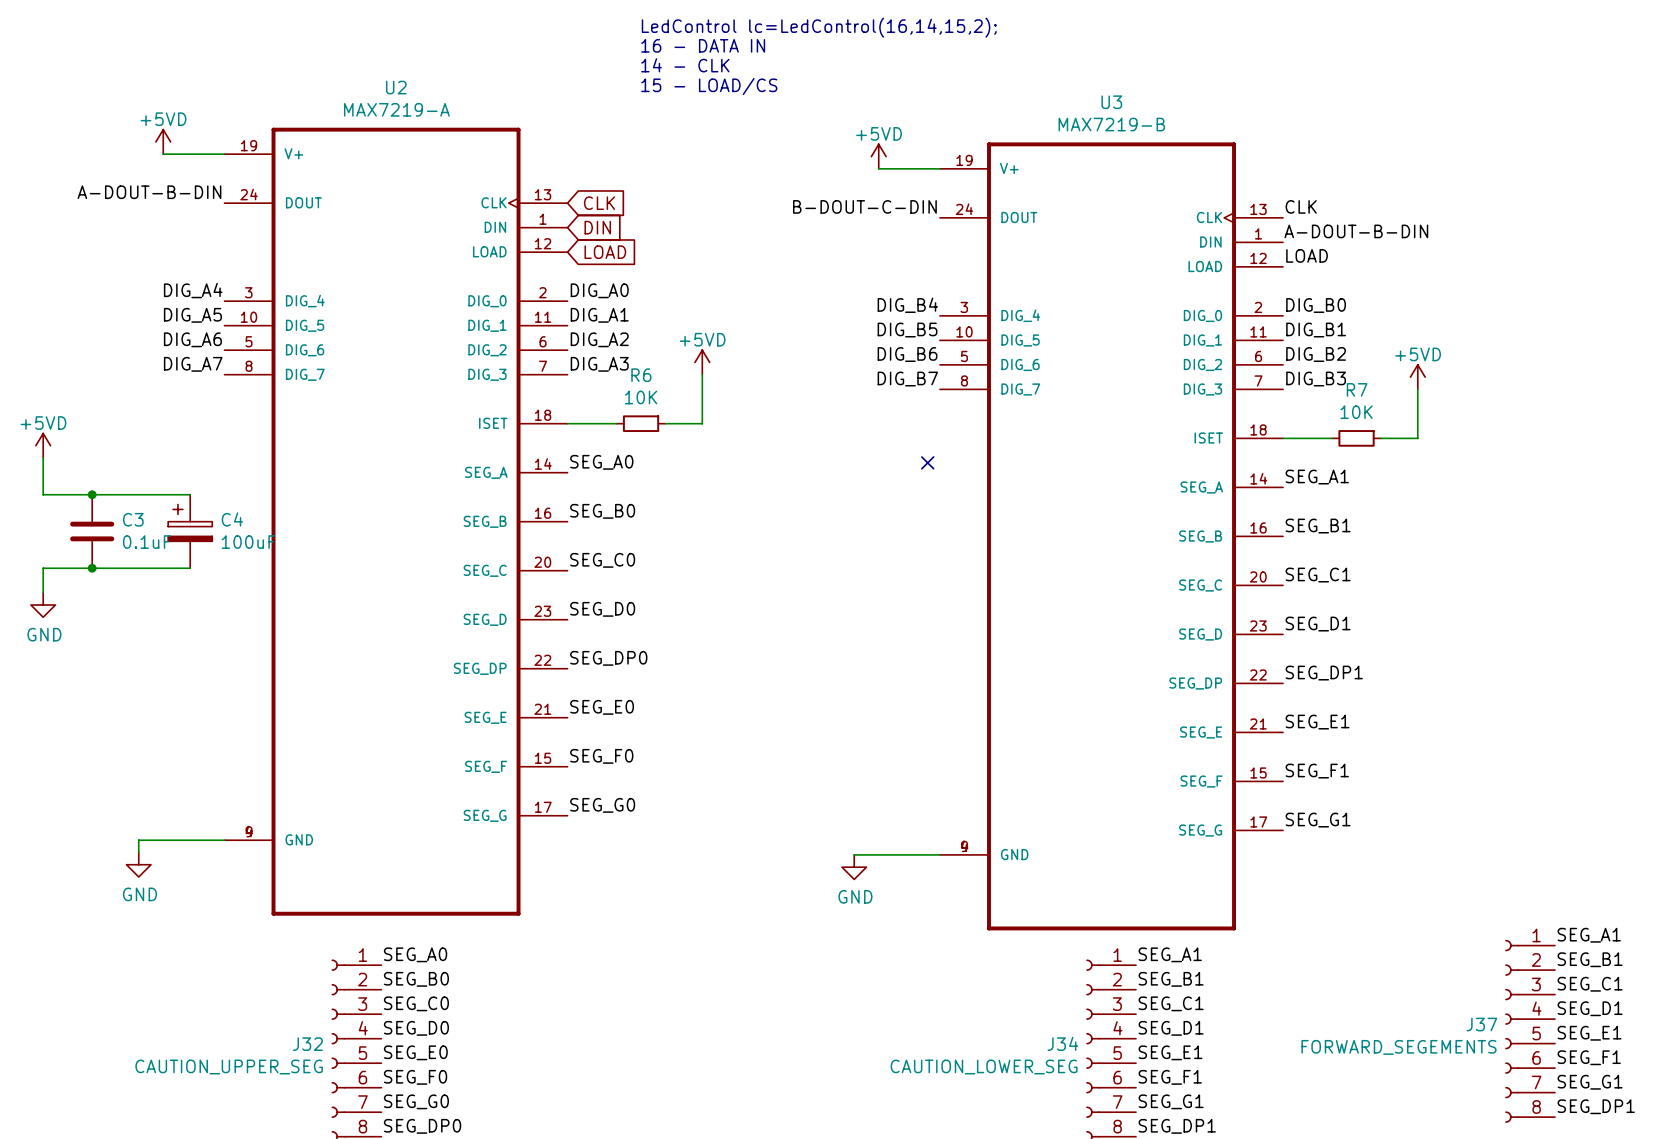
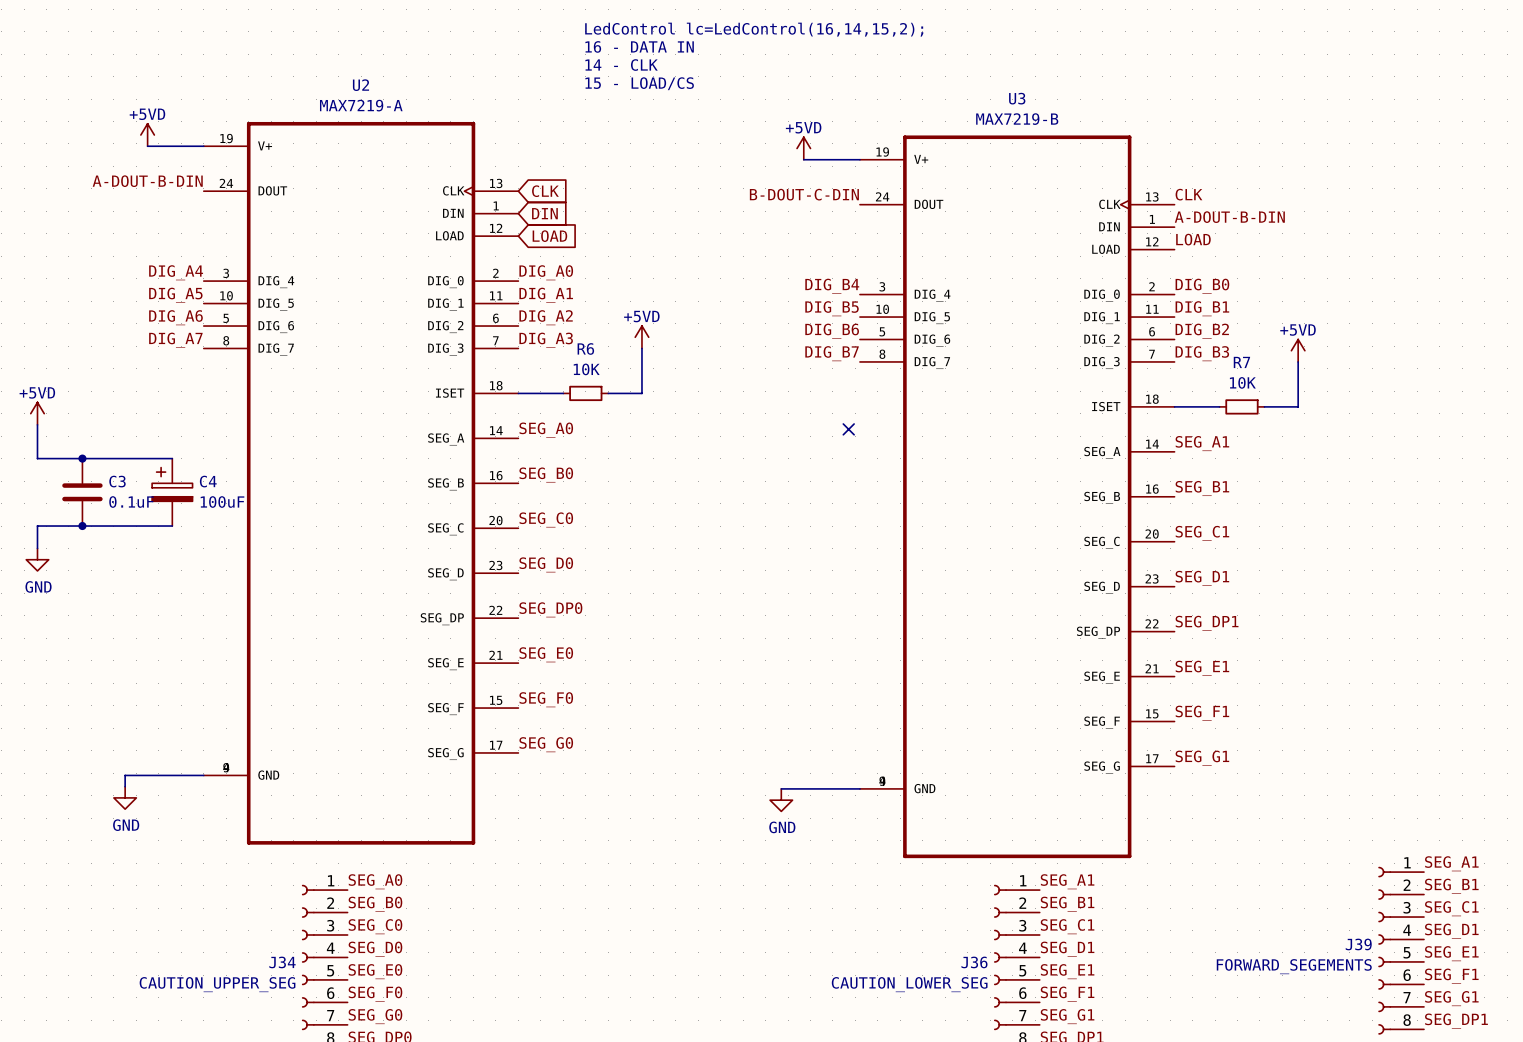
J37 name: J37 (1481, 1024) -> J39 (1358, 944)
J34 name: J34 (1062, 1043) -> J36 (974, 962)
J32 name: J32 (307, 1044) -> J34 (282, 962)

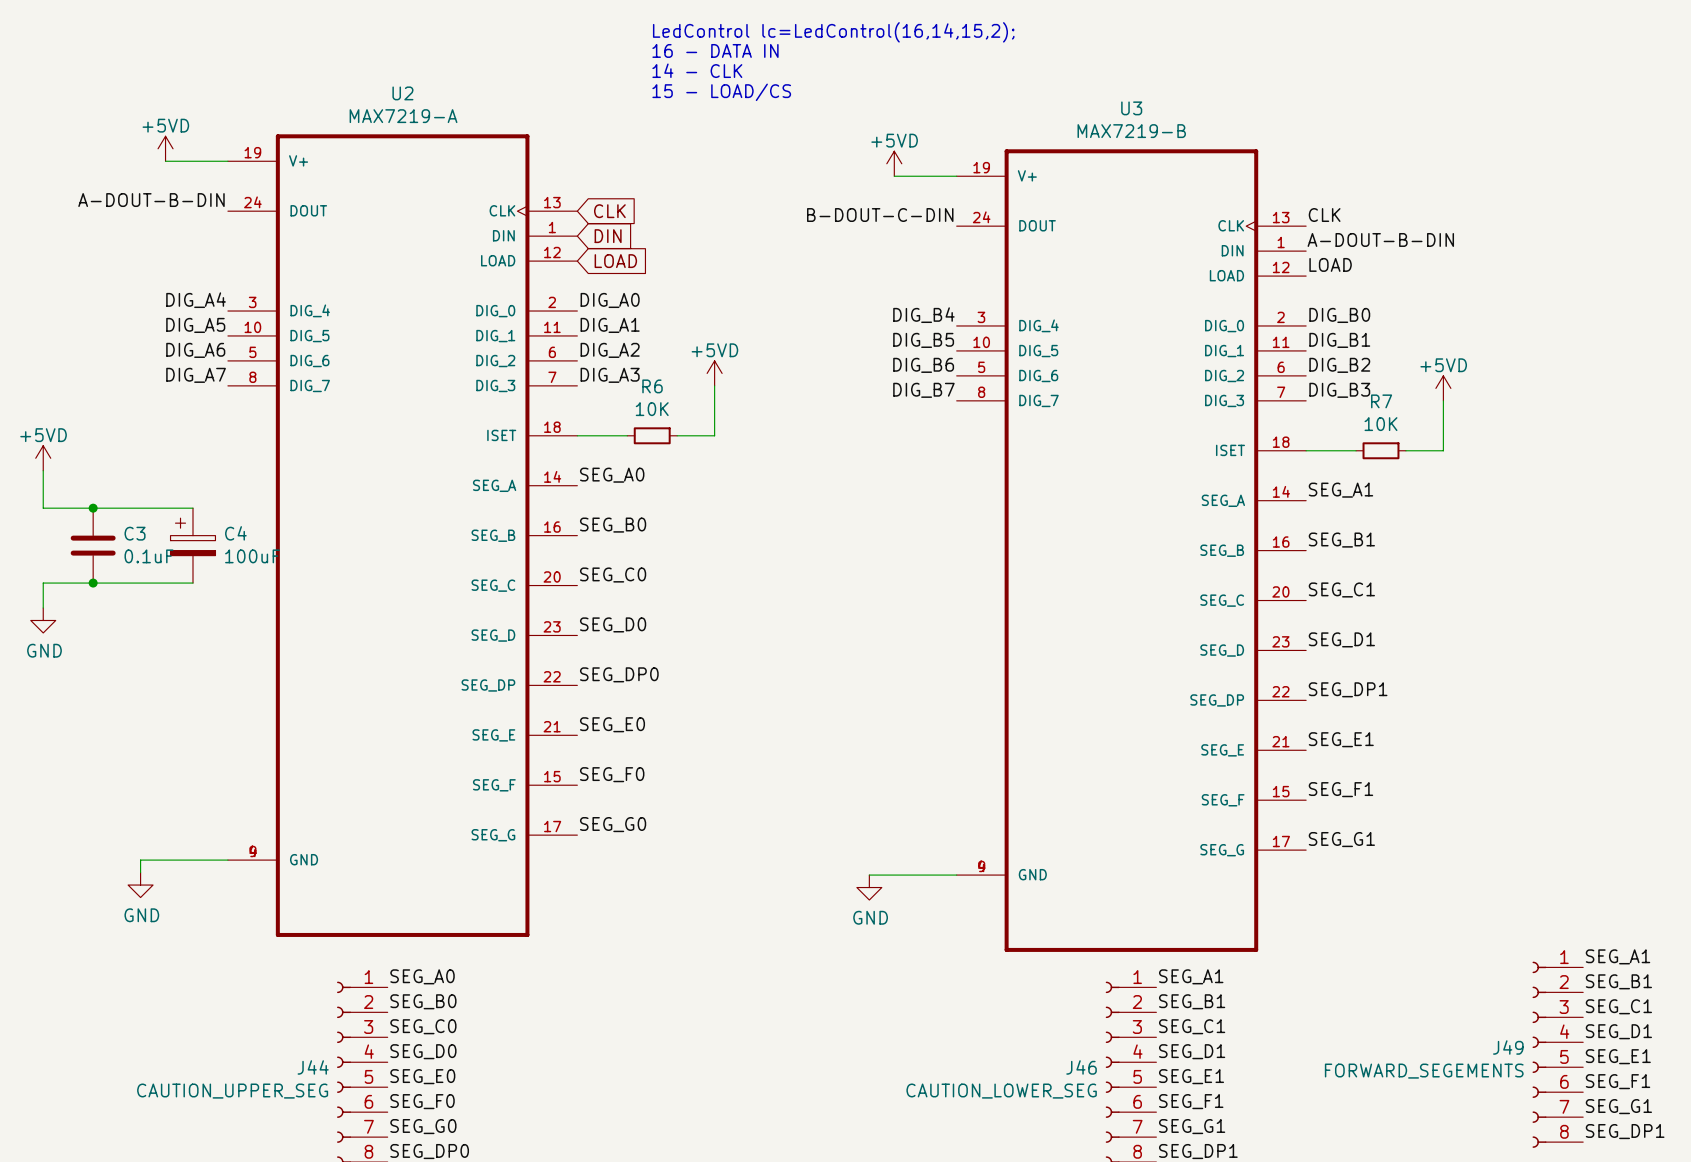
no-connect mark: (848, 429) -> none
J39 name: J39 (1358, 944) -> J49 (1508, 1047)
J34 name: J34 (282, 962) -> J44 (313, 1067)
J36 name: J36 (974, 962) -> J46 (1081, 1067)

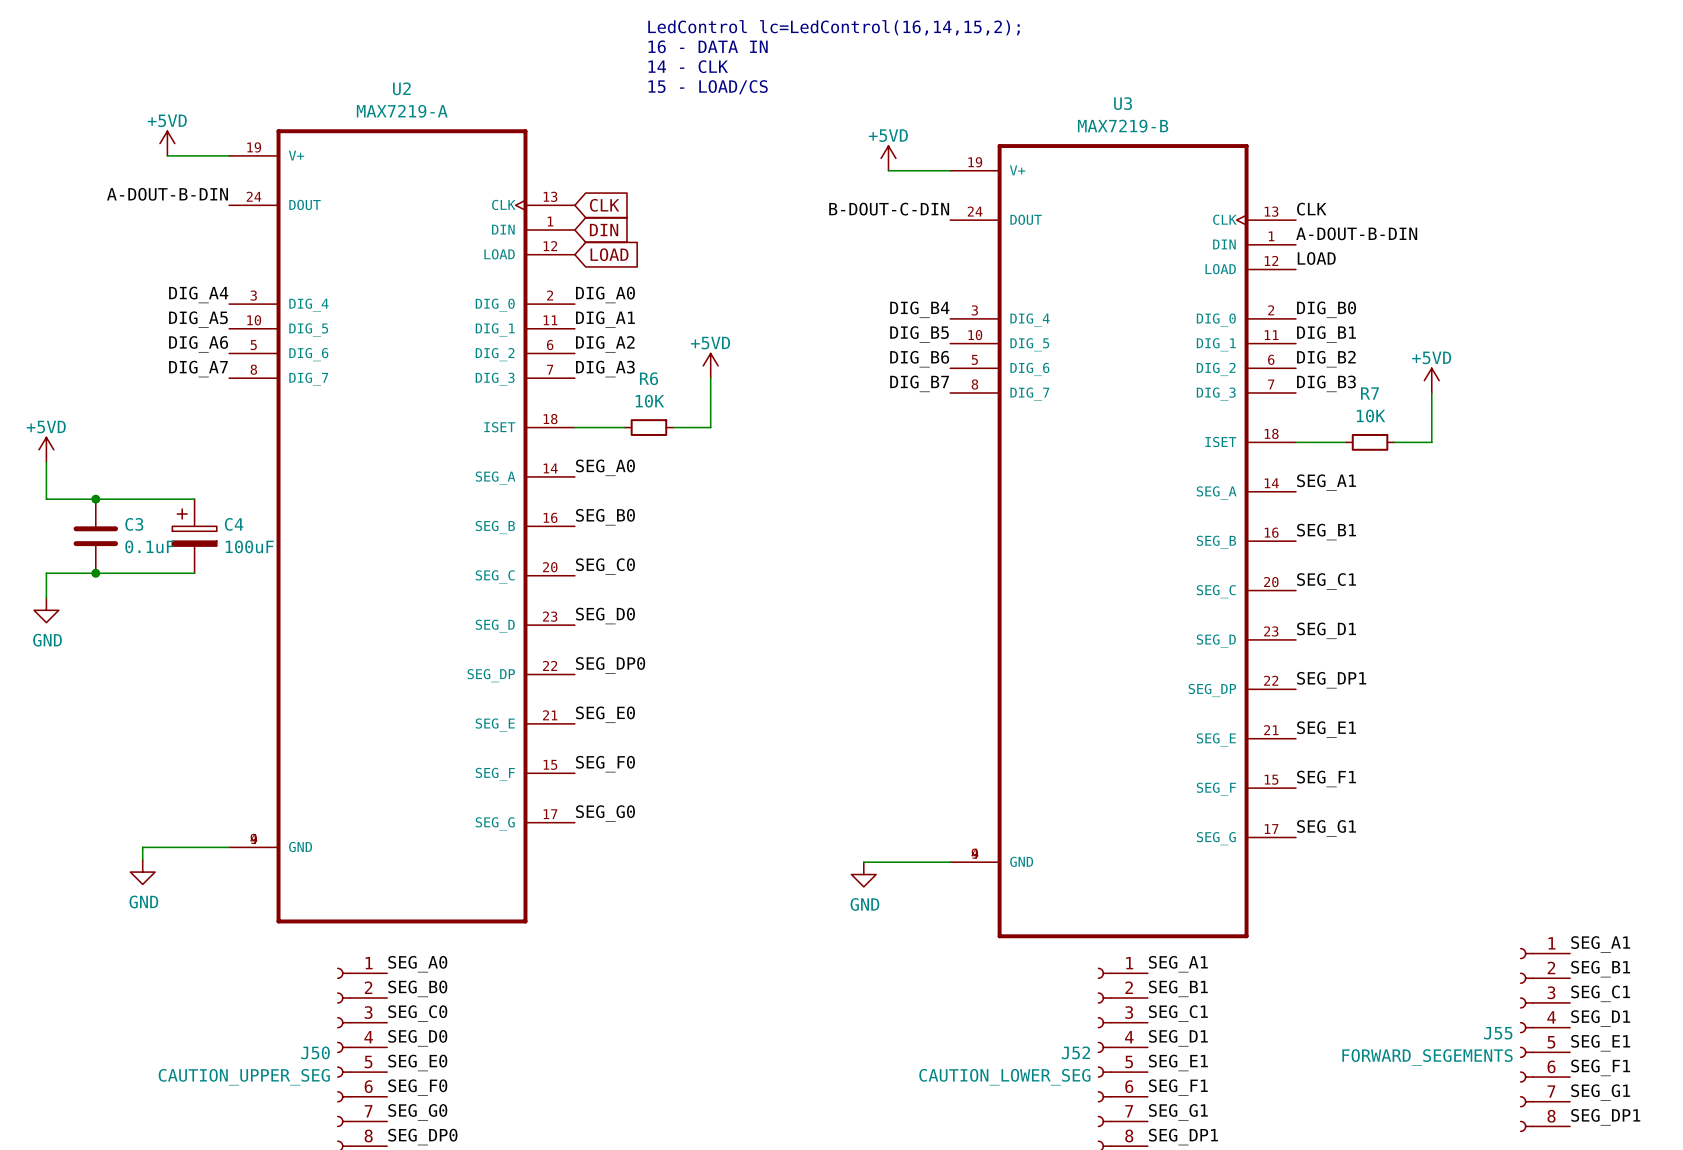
J49 name: J49 (1508, 1047) -> J55 (1498, 1033)
J44 name: J44 (313, 1067) -> J50 (315, 1052)
J46 name: J46 (1081, 1067) -> J52 (1075, 1052)

